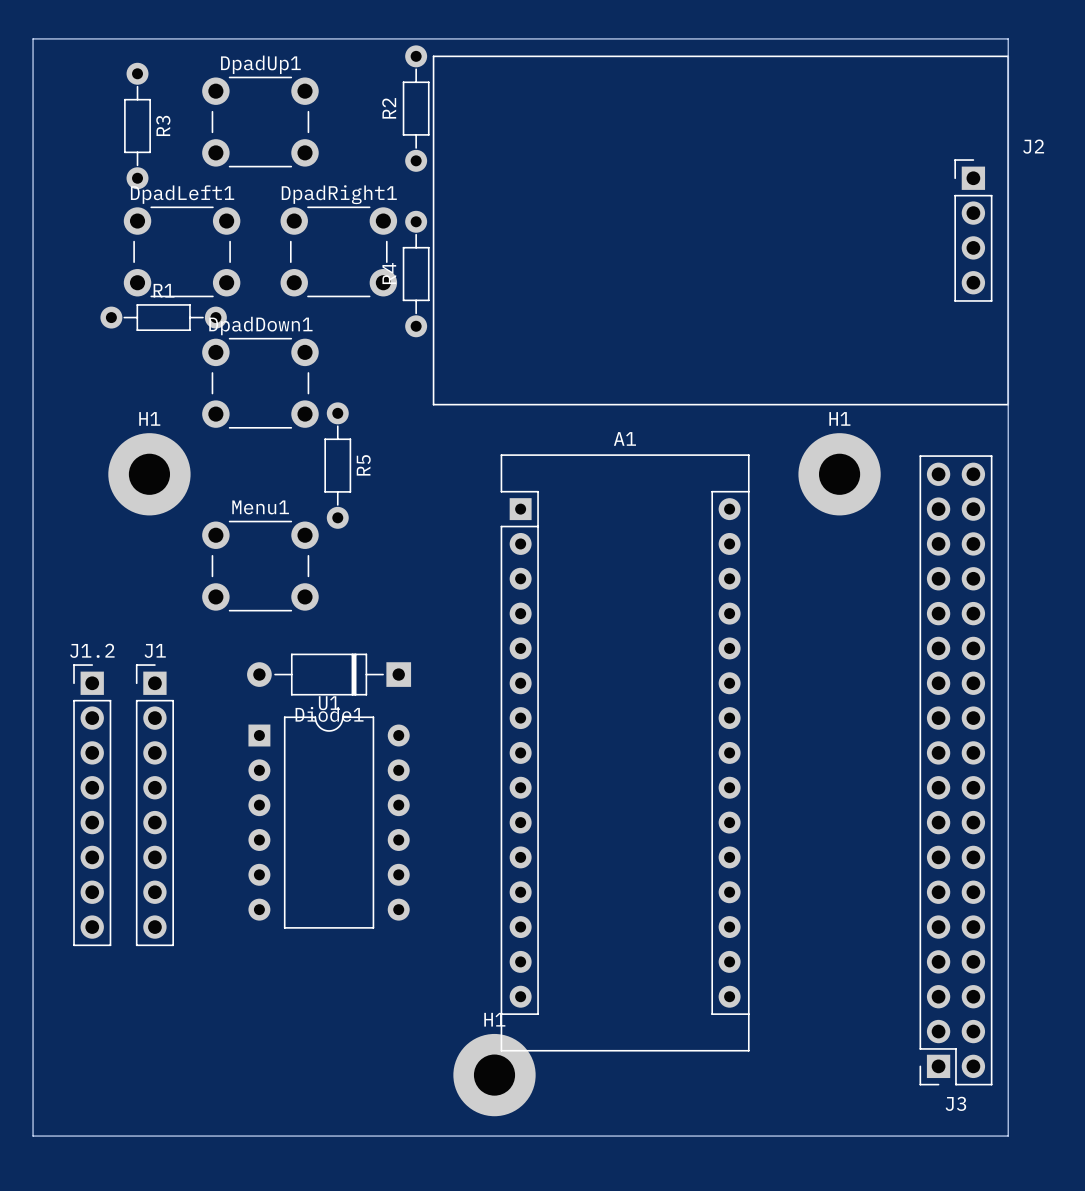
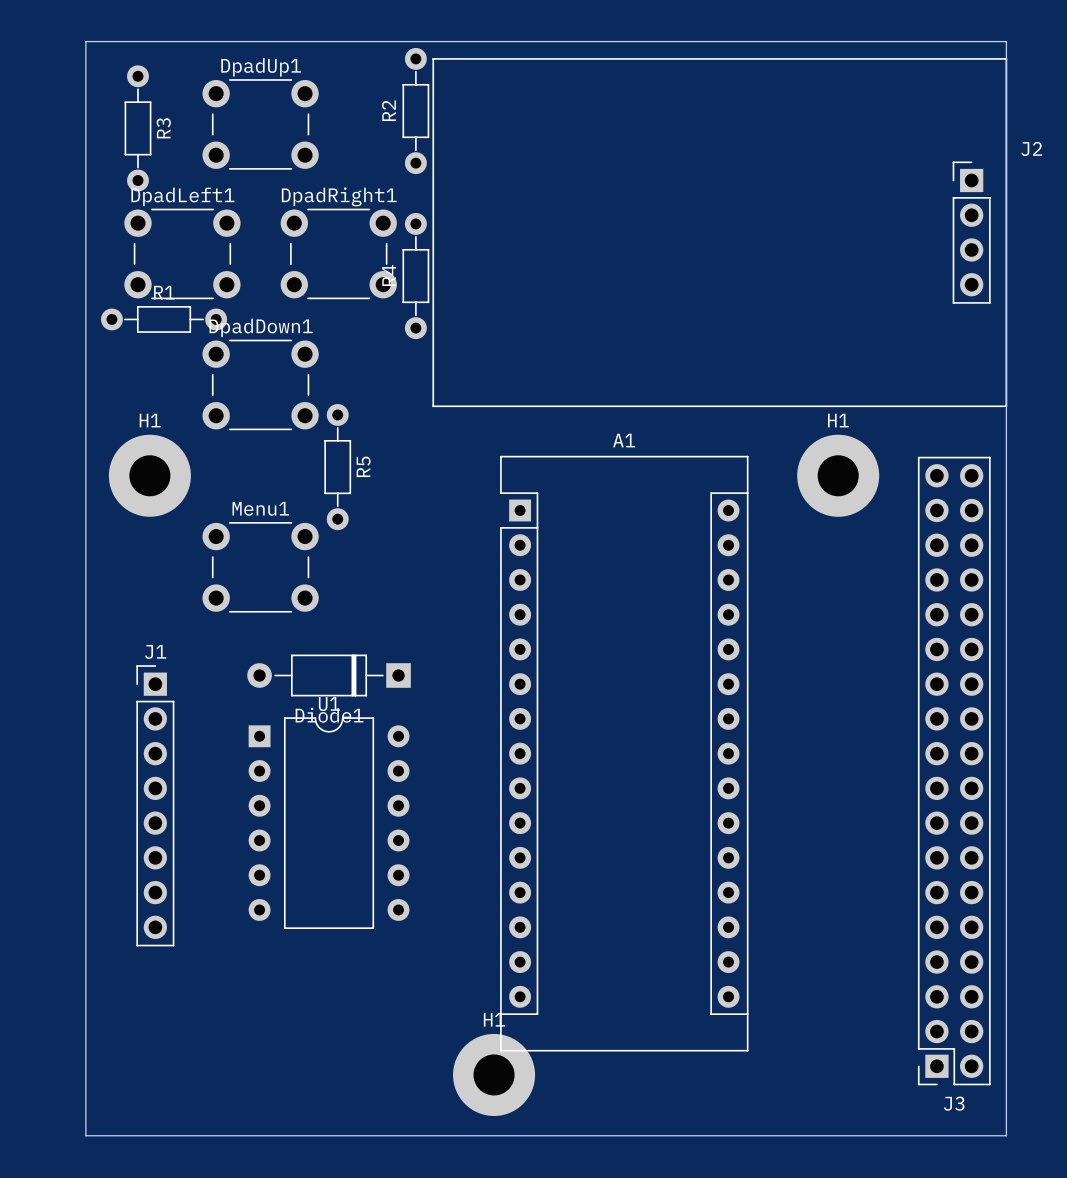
board edge: (85, 38) (33, 38) (33, 1136) (85, 1136) -> (85, 41) (85, 1135)
J1.2: (92, 805) -> none

